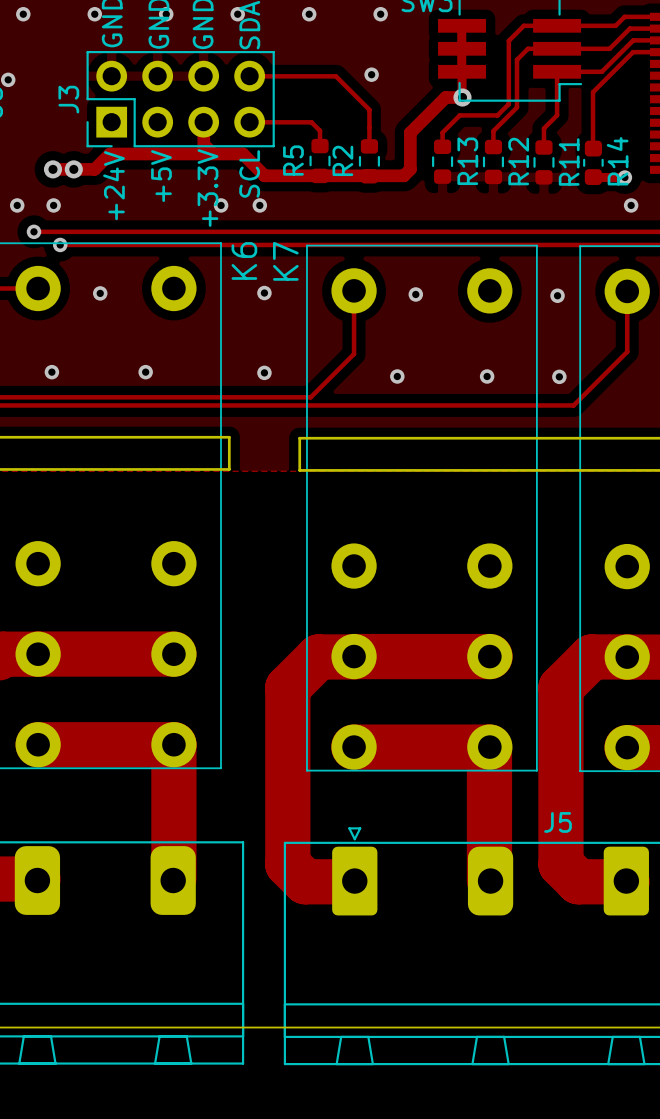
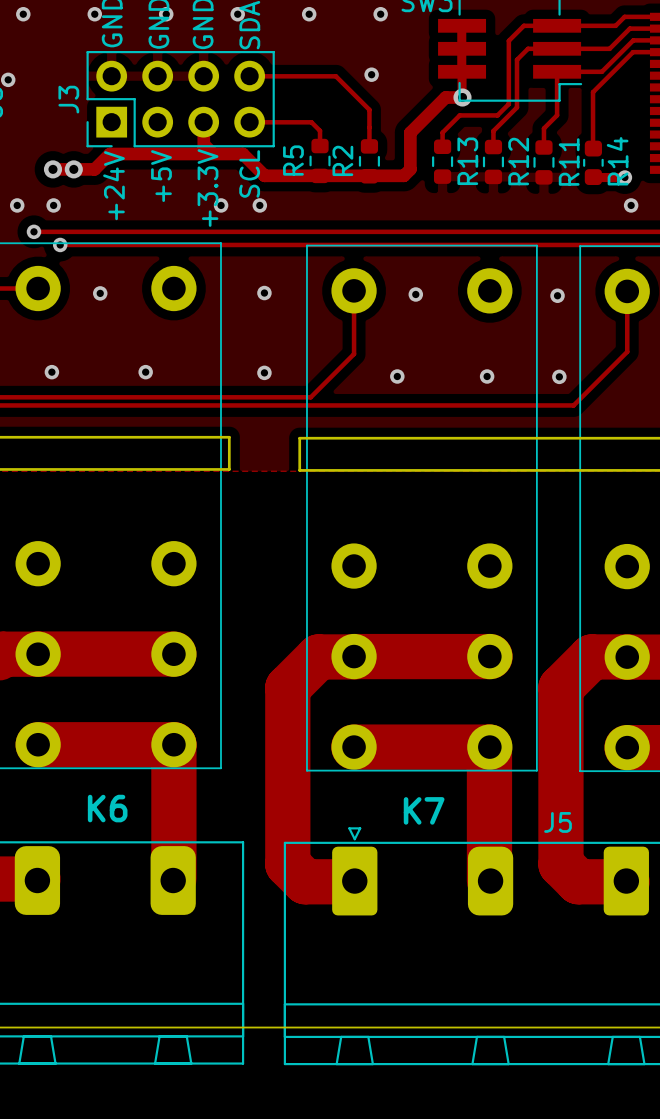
K6 name rotation: 0° (244, 260) -> 90° clockwise (107, 808)
K6 name position: K6 (244, 260) -> K6 (107, 808)
K7 name rotation: 0° (285, 261) -> 90° clockwise (424, 810)
K7 name position: K7 (285, 261) -> K7 (424, 810)

